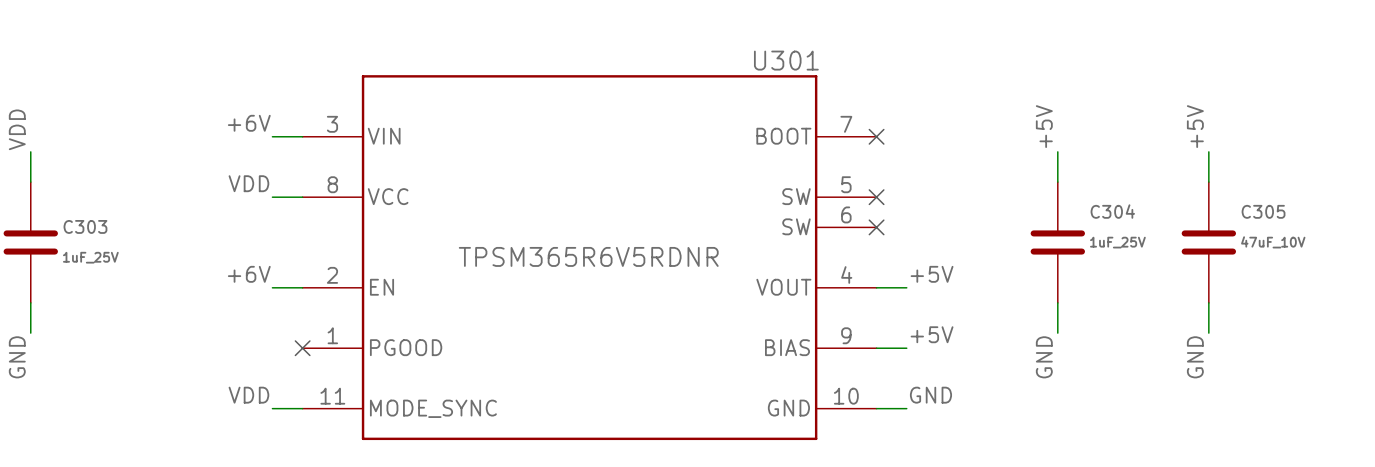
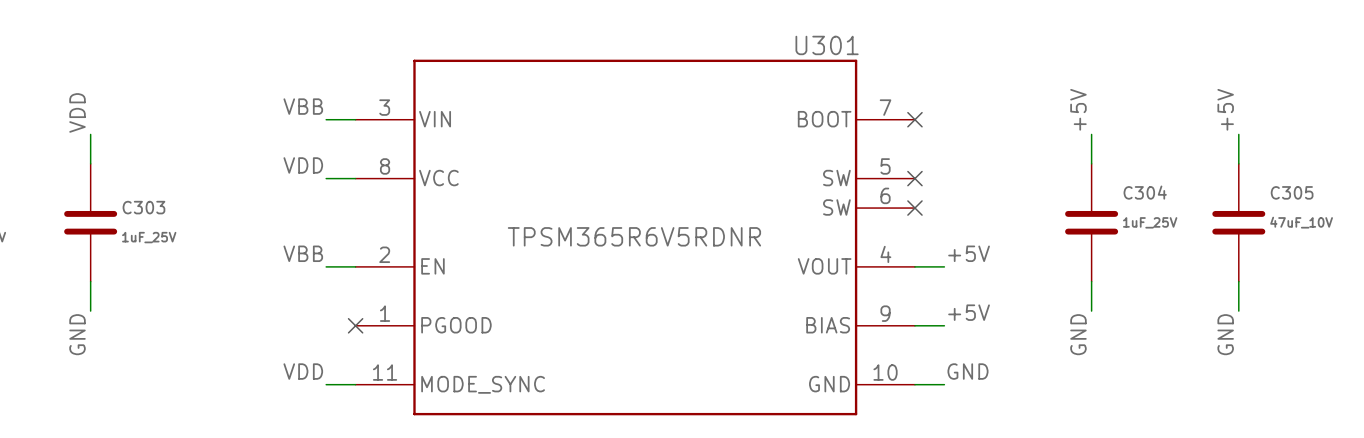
label: +6V (249, 123) -> VBB (303, 106)
label: +6V (249, 274) -> VBB (303, 253)

